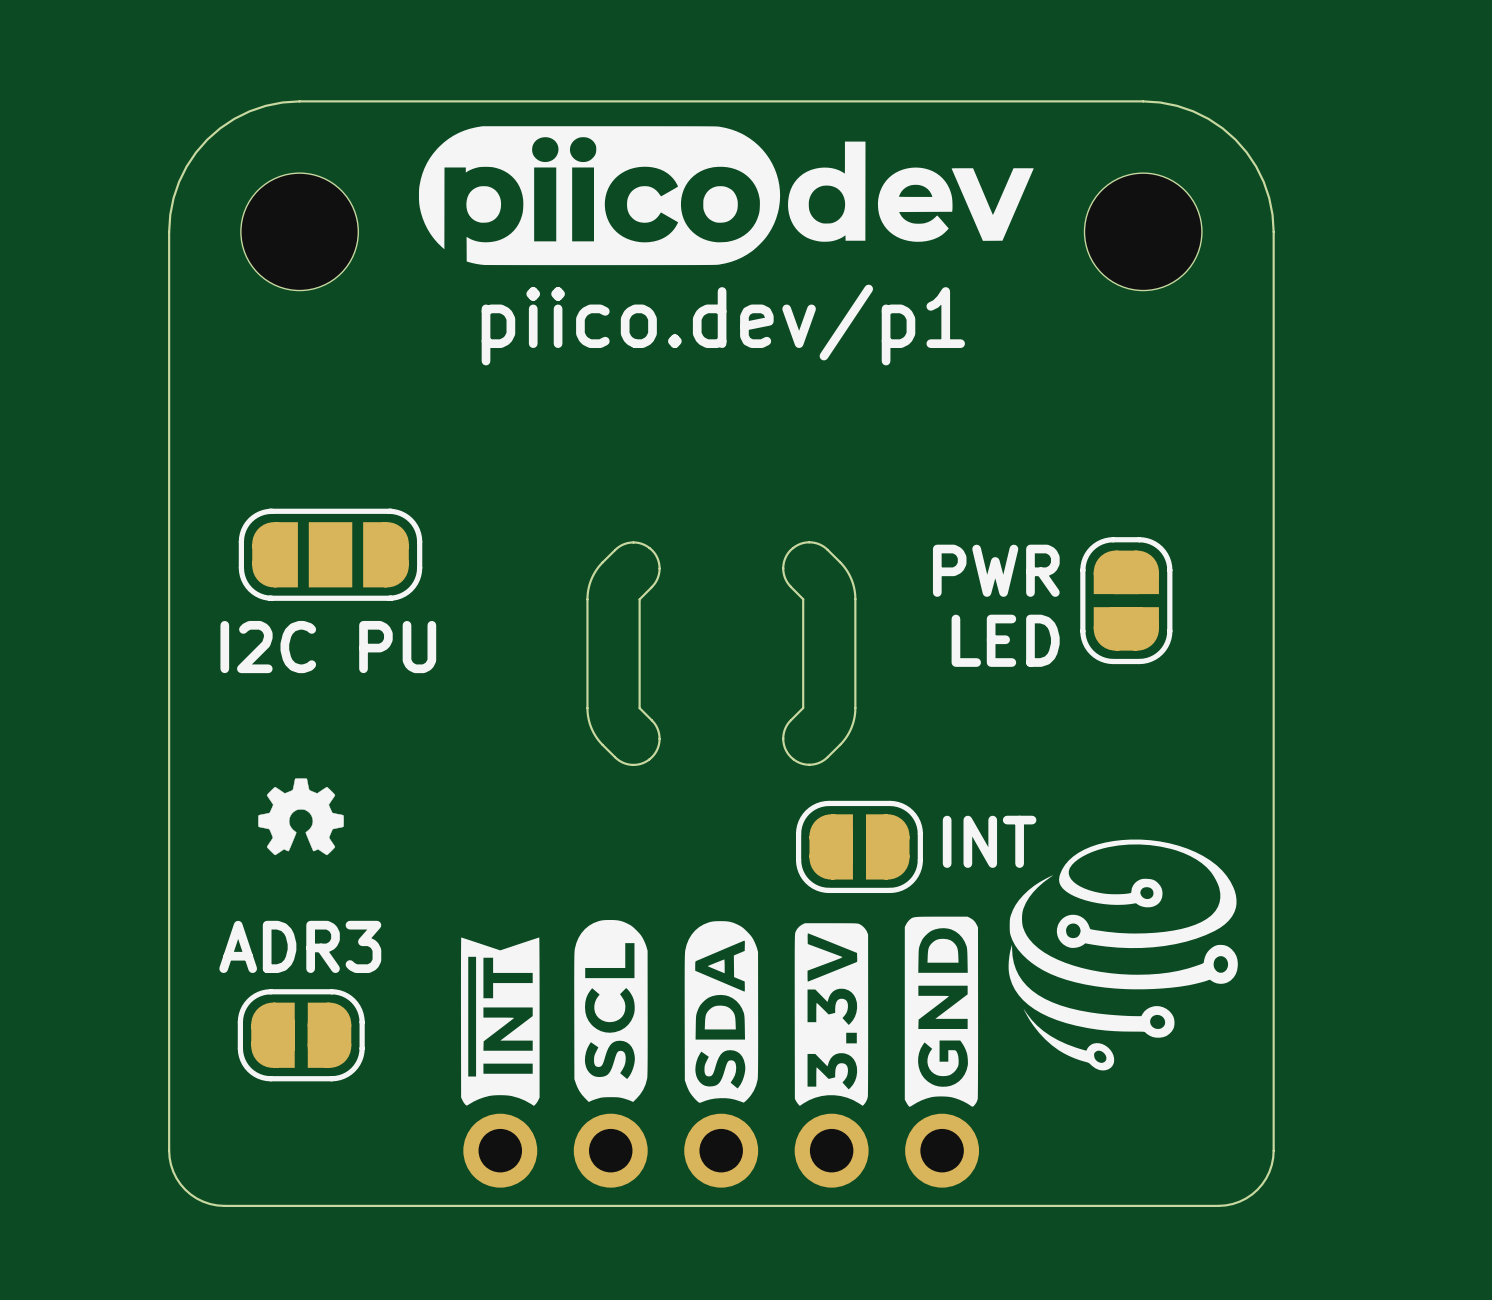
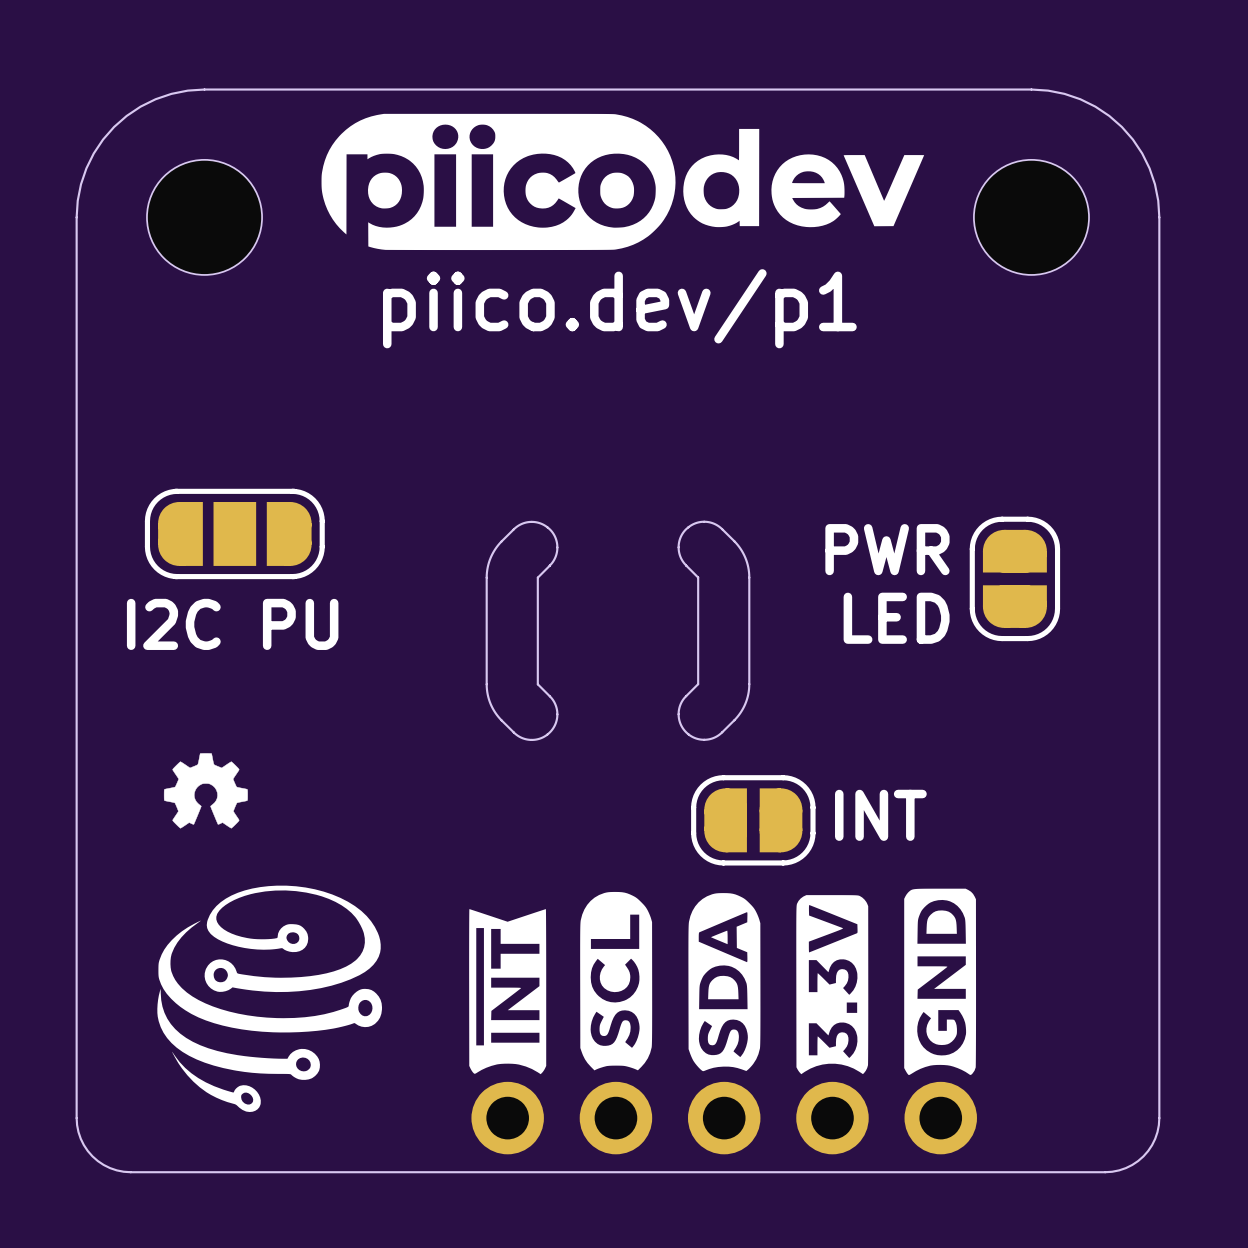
text: ADR3 (300, 946) -> none
drawing position: (1123, 955) -> (269, 998)
part: (301, 1035) -> none
part position: (720, 1052) -> (723, 1021)

